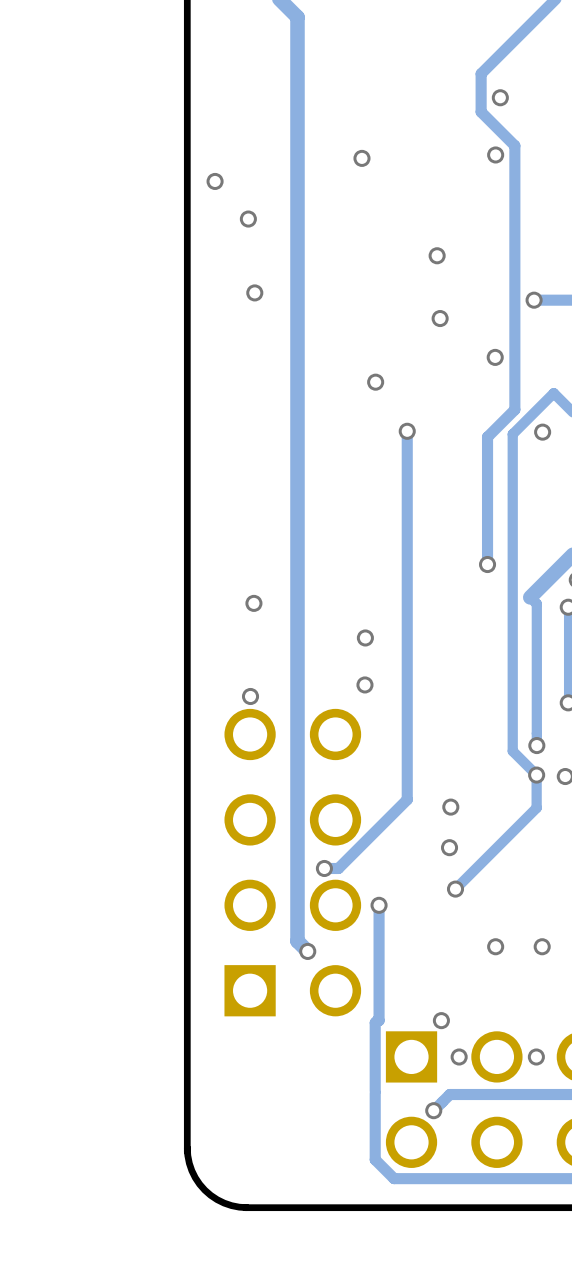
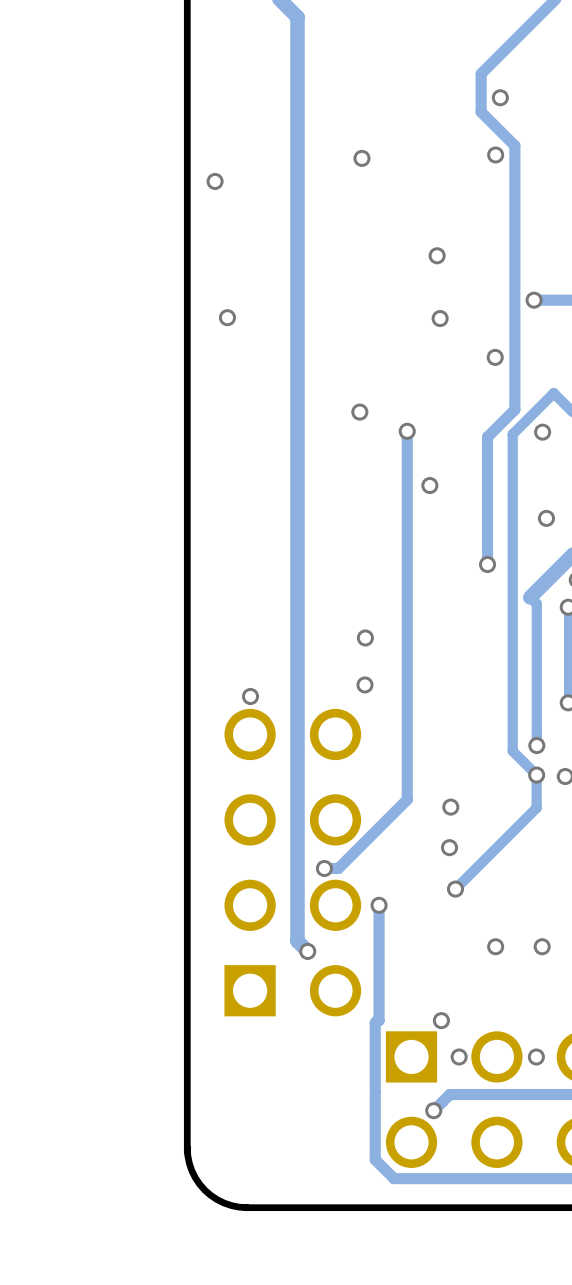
via: (248, 219) -> none
via position: (254, 292) -> (227, 317)
via position: (375, 382) -> (359, 412)
via: none -> (429, 485)
via: none -> (546, 518)
via: (253, 603) -> none

